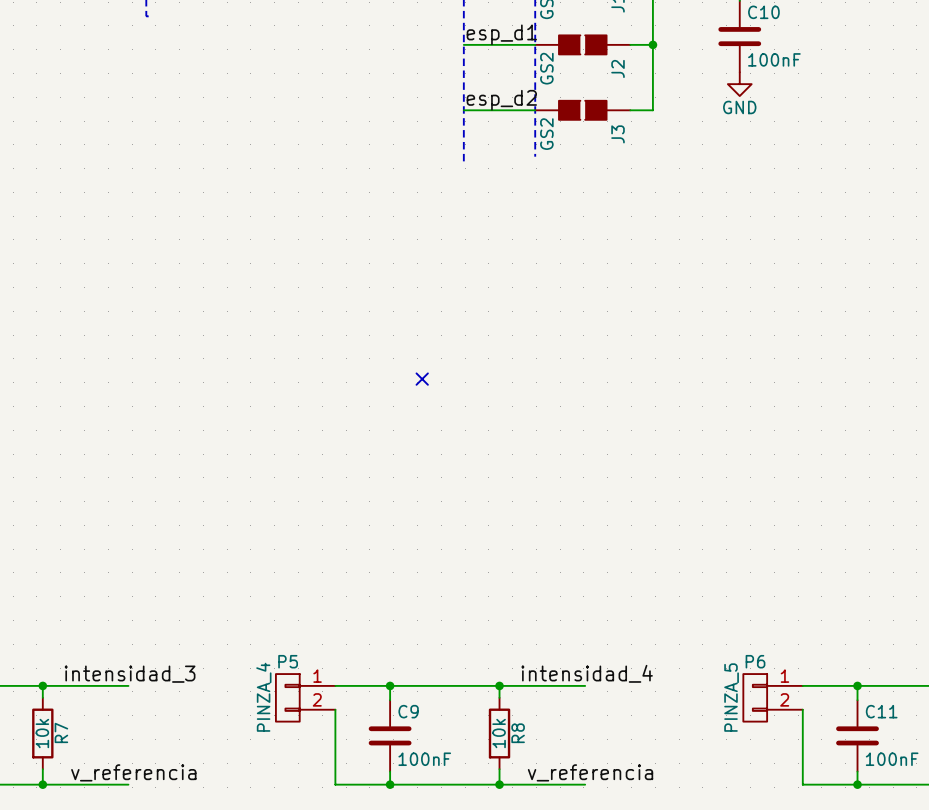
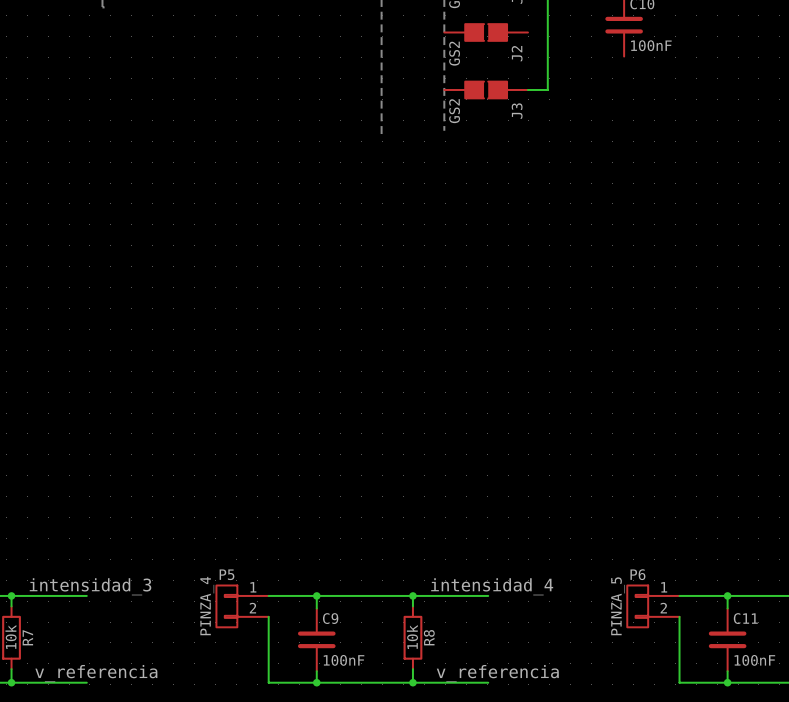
label: esp_d1 (501, 34) -> none
wire: (463, 44) (535, 44) -> none
wire: (630, 44) (652, 44) -> none
junction: (652, 44) -> none
power symbol: GND (739, 84) -> none
label: esp_d2 (501, 100) -> none
wire: (463, 110) (535, 110) -> none
no-connect mark: (422, 379) -> none

